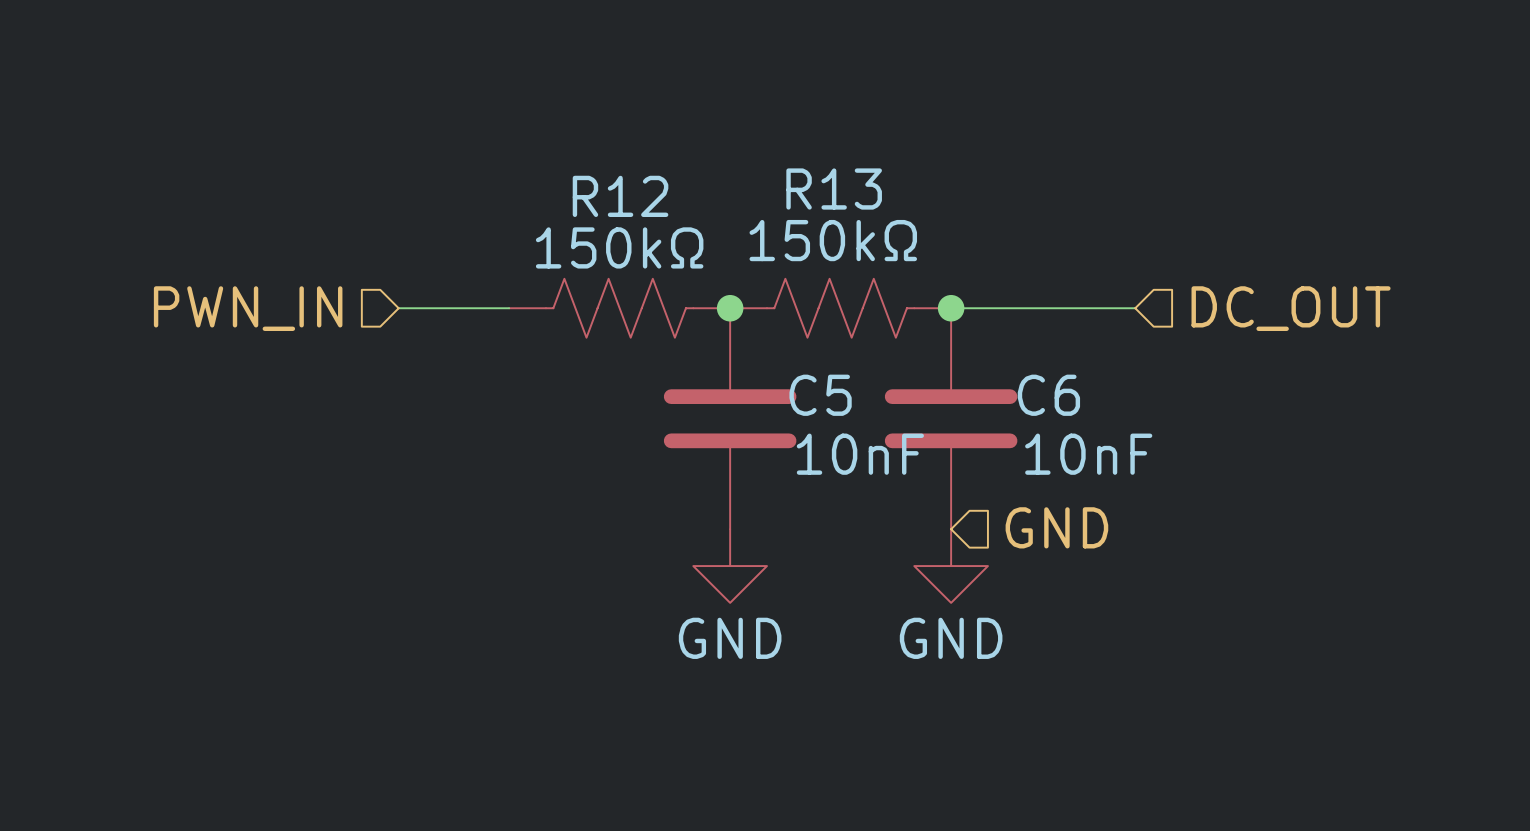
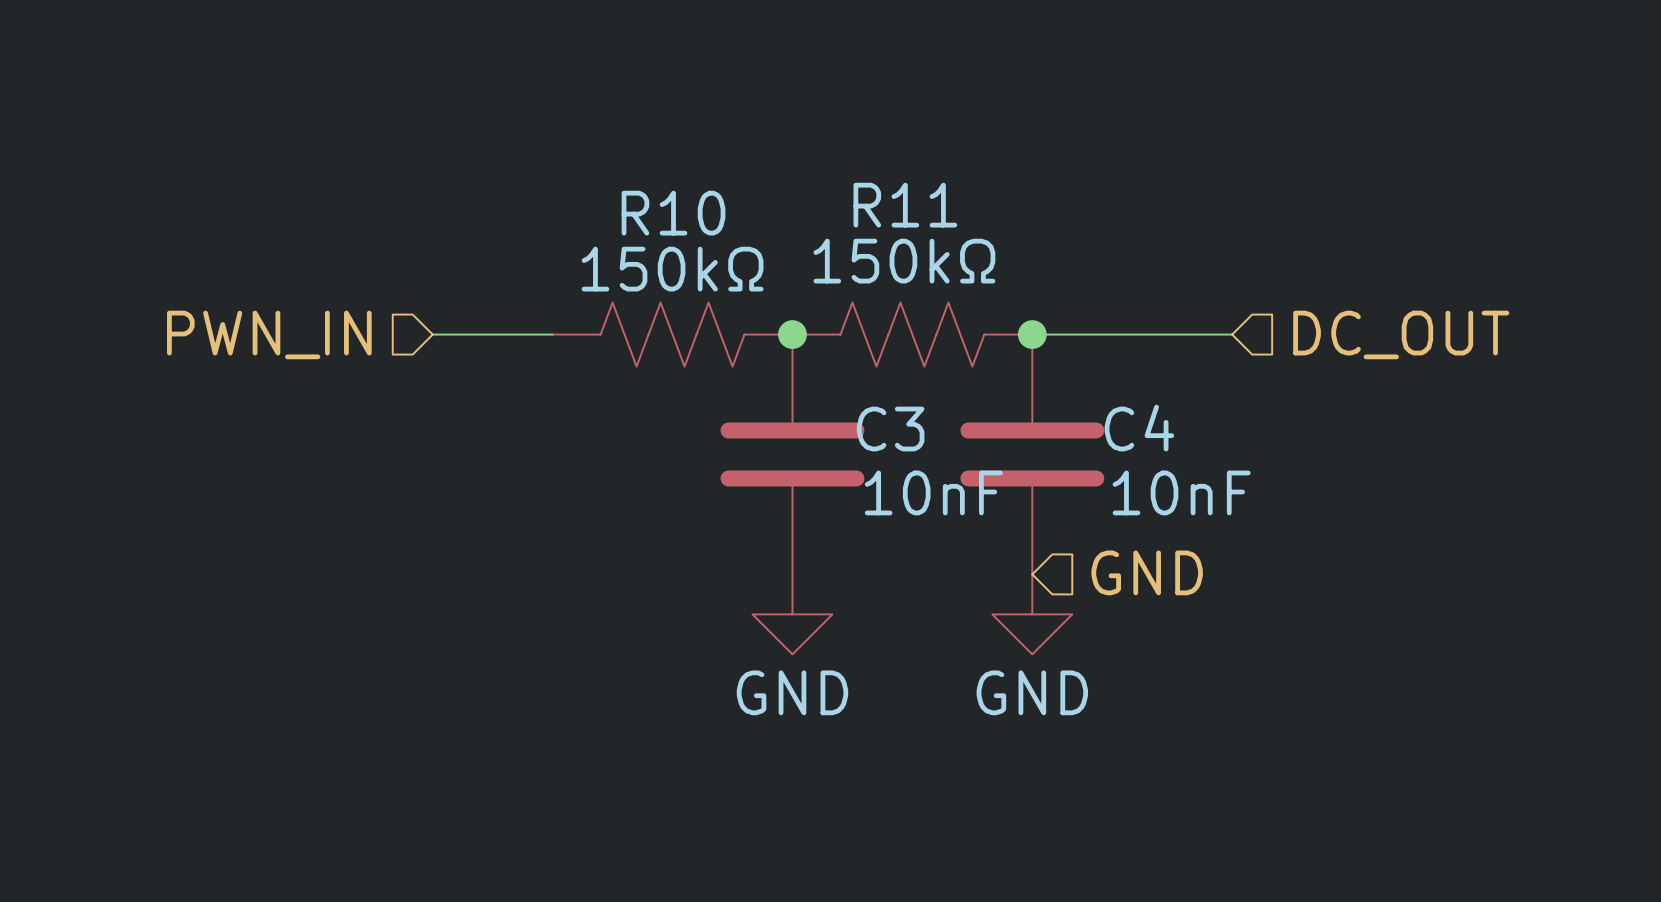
R13 name: R13 (834, 189) -> R11 (905, 205)
R12 name: R12 (620, 196) -> R10 (673, 213)
C5 name: C5 (820, 395) -> C3 (890, 429)
C6 name: C6 (1048, 395) -> C4 (1139, 428)

